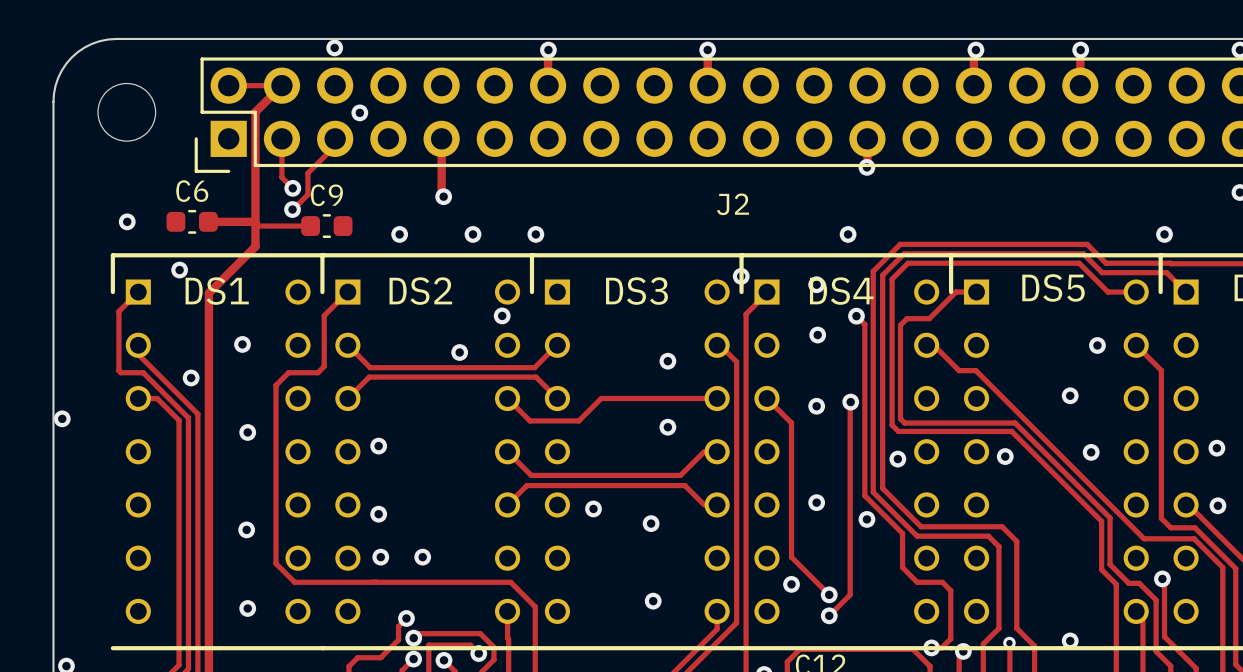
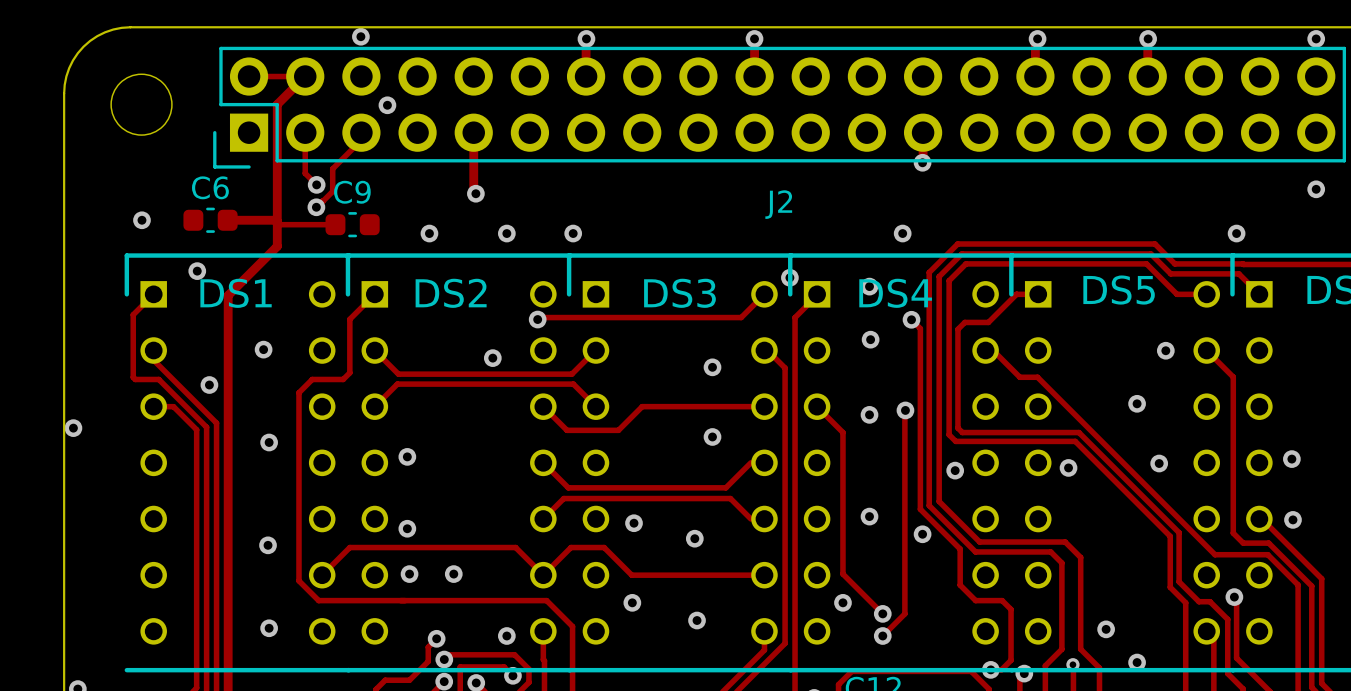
track: none -> (764, 294) (741, 317) (539, 317)
track: none -> (322, 575) (349, 547) (515, 547) (543, 575) (570, 547) (604, 547) (631, 575) (762, 575)
via: none -> (632, 602)
via: none -> (1106, 629)
via: none -> (506, 635)

